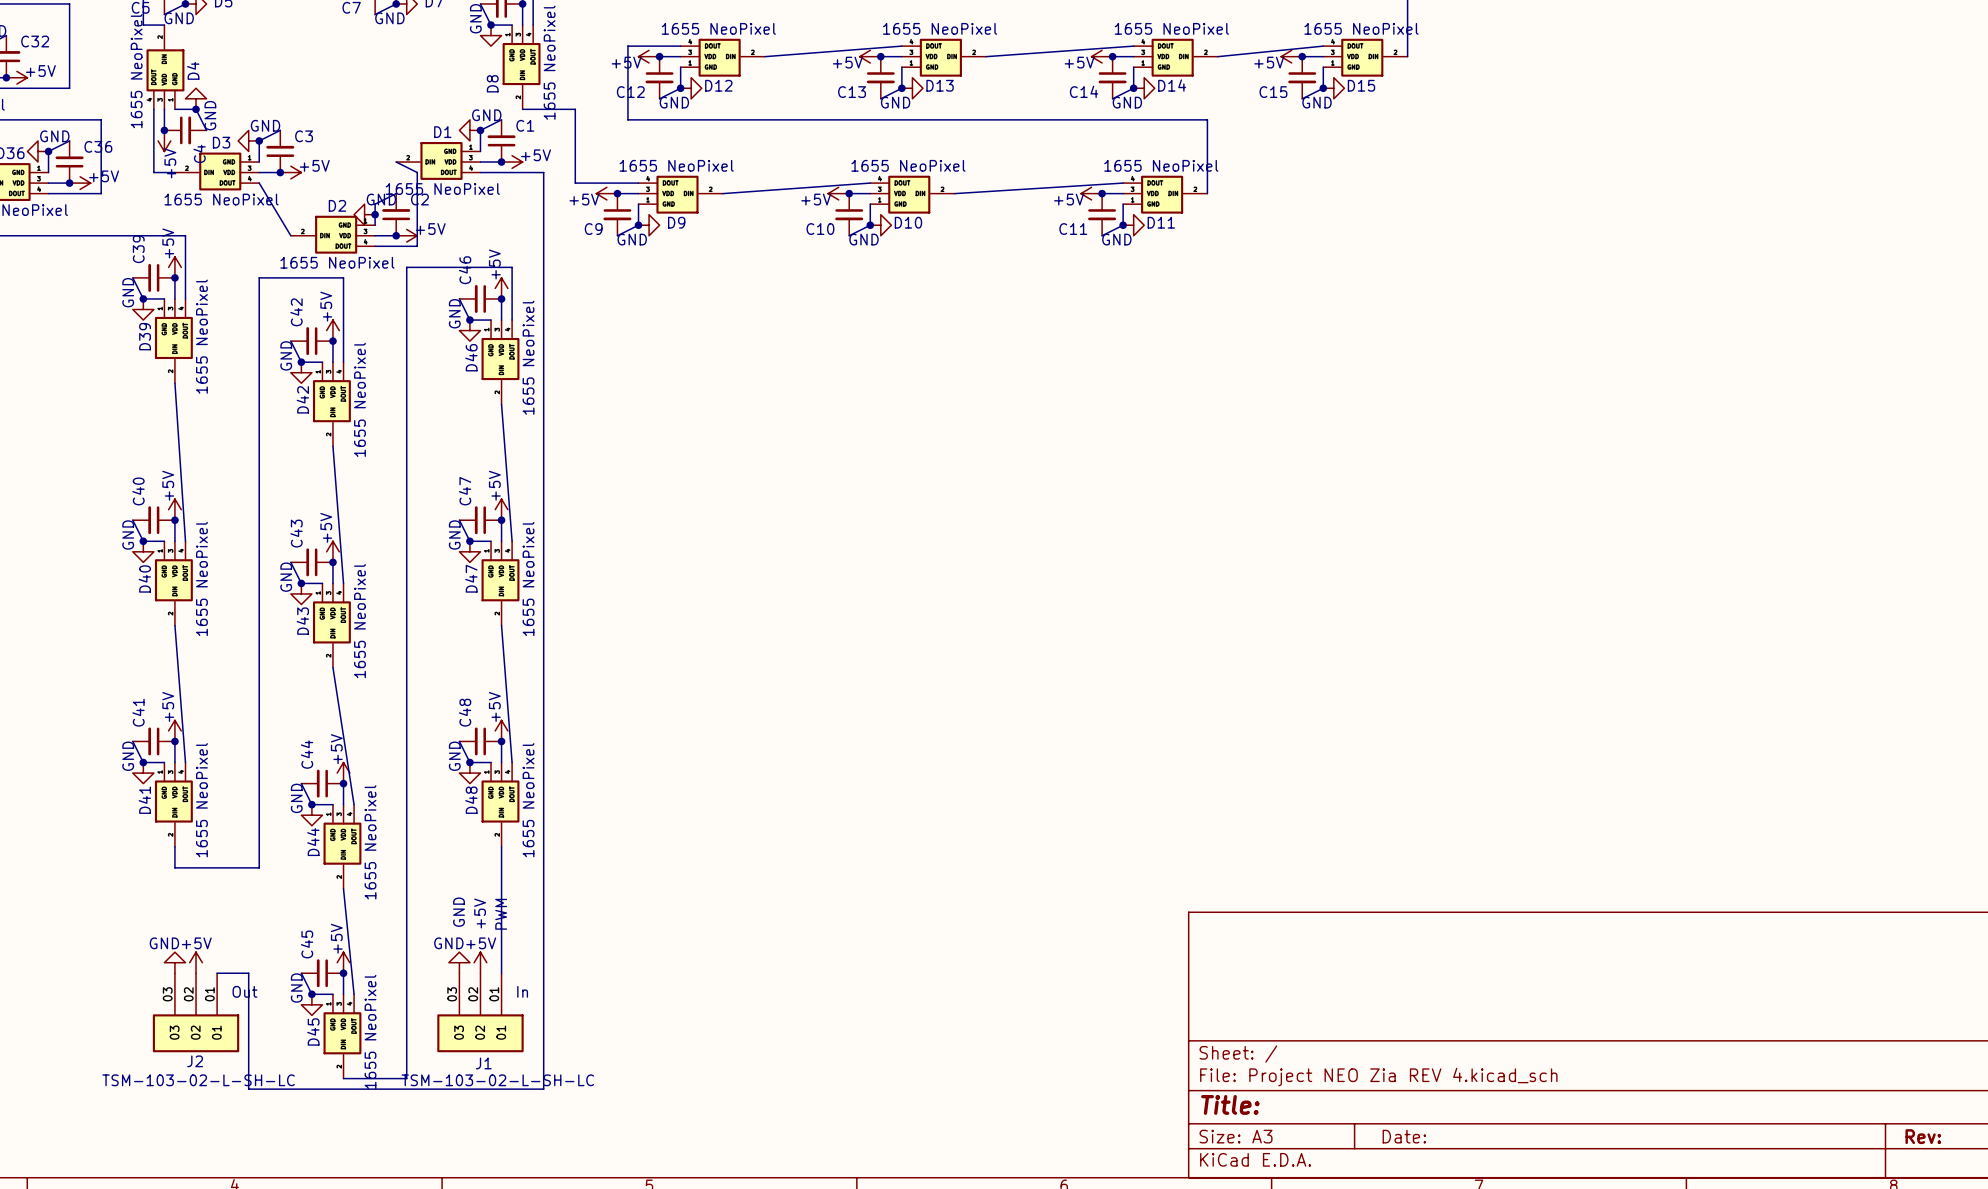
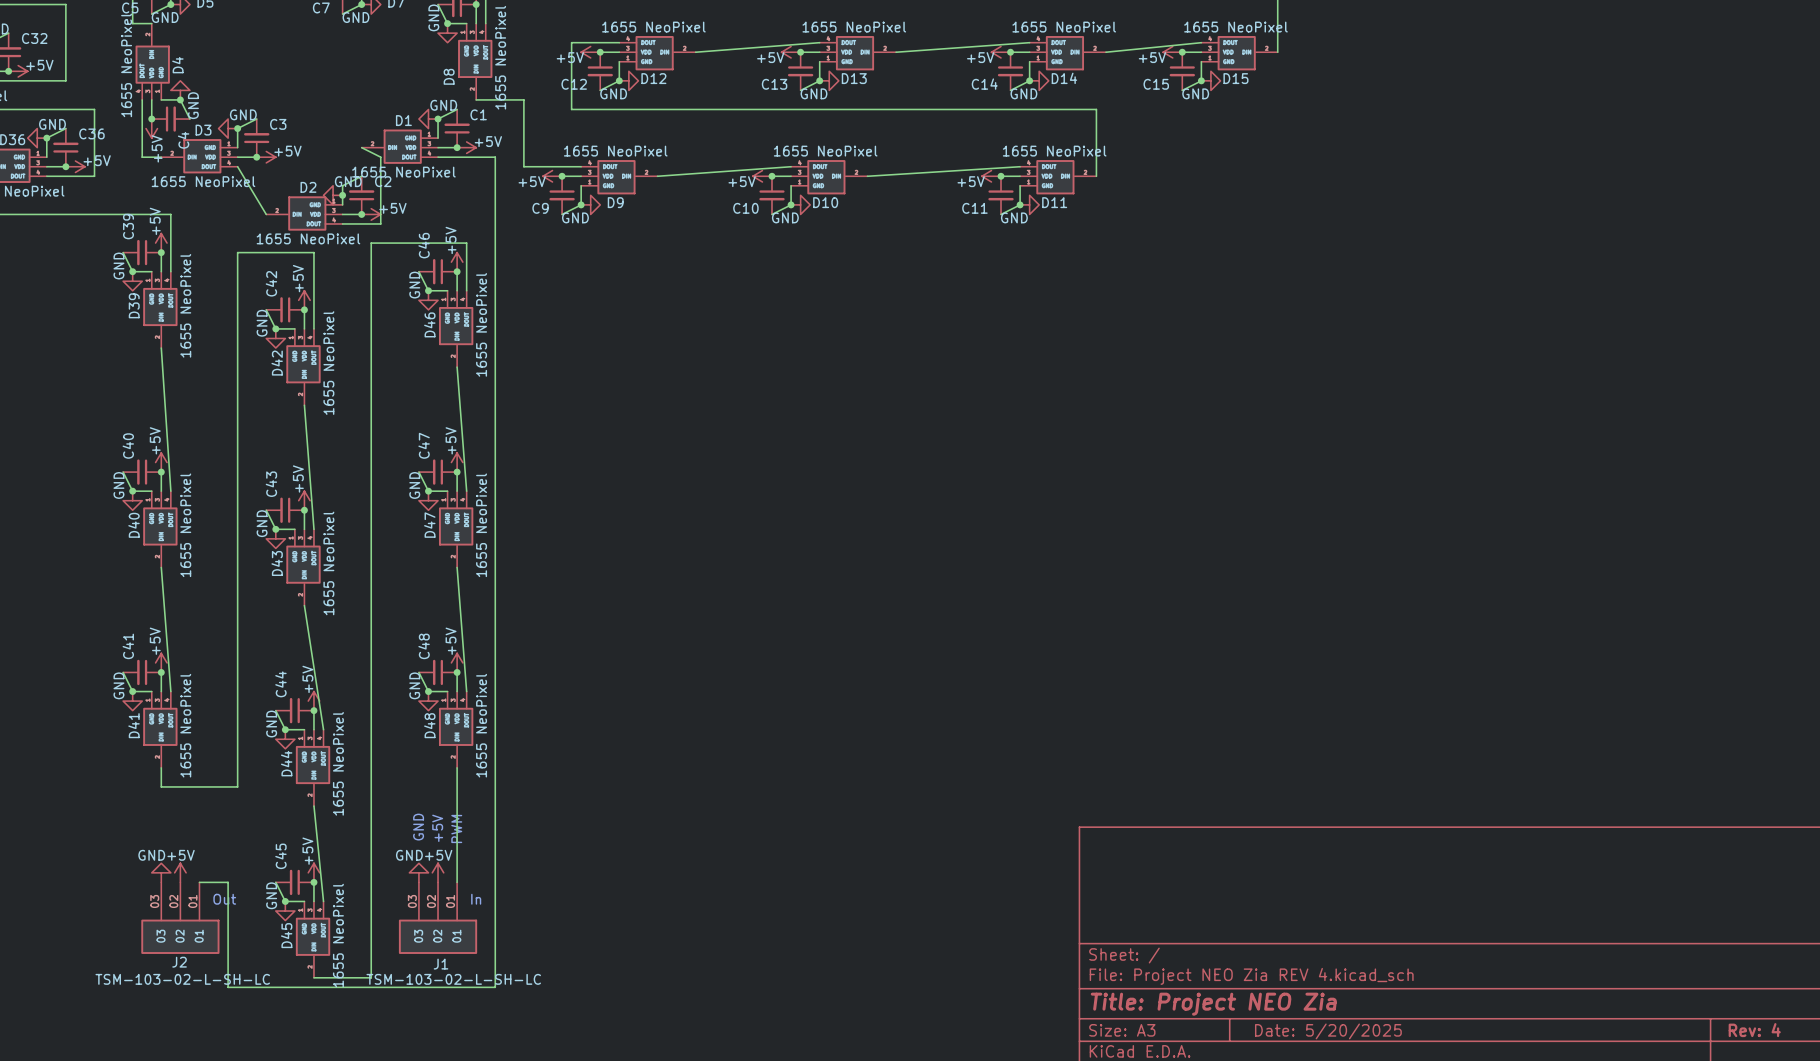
title block: Title: (1230, 1104) -> Title: Project NEO Zia (1213, 1004)
title block: Date: (1404, 1136) -> Date: 5/20/2025 (1328, 1031)
title block: Rev: (1923, 1136) -> Rev: 4 (1754, 1030)

